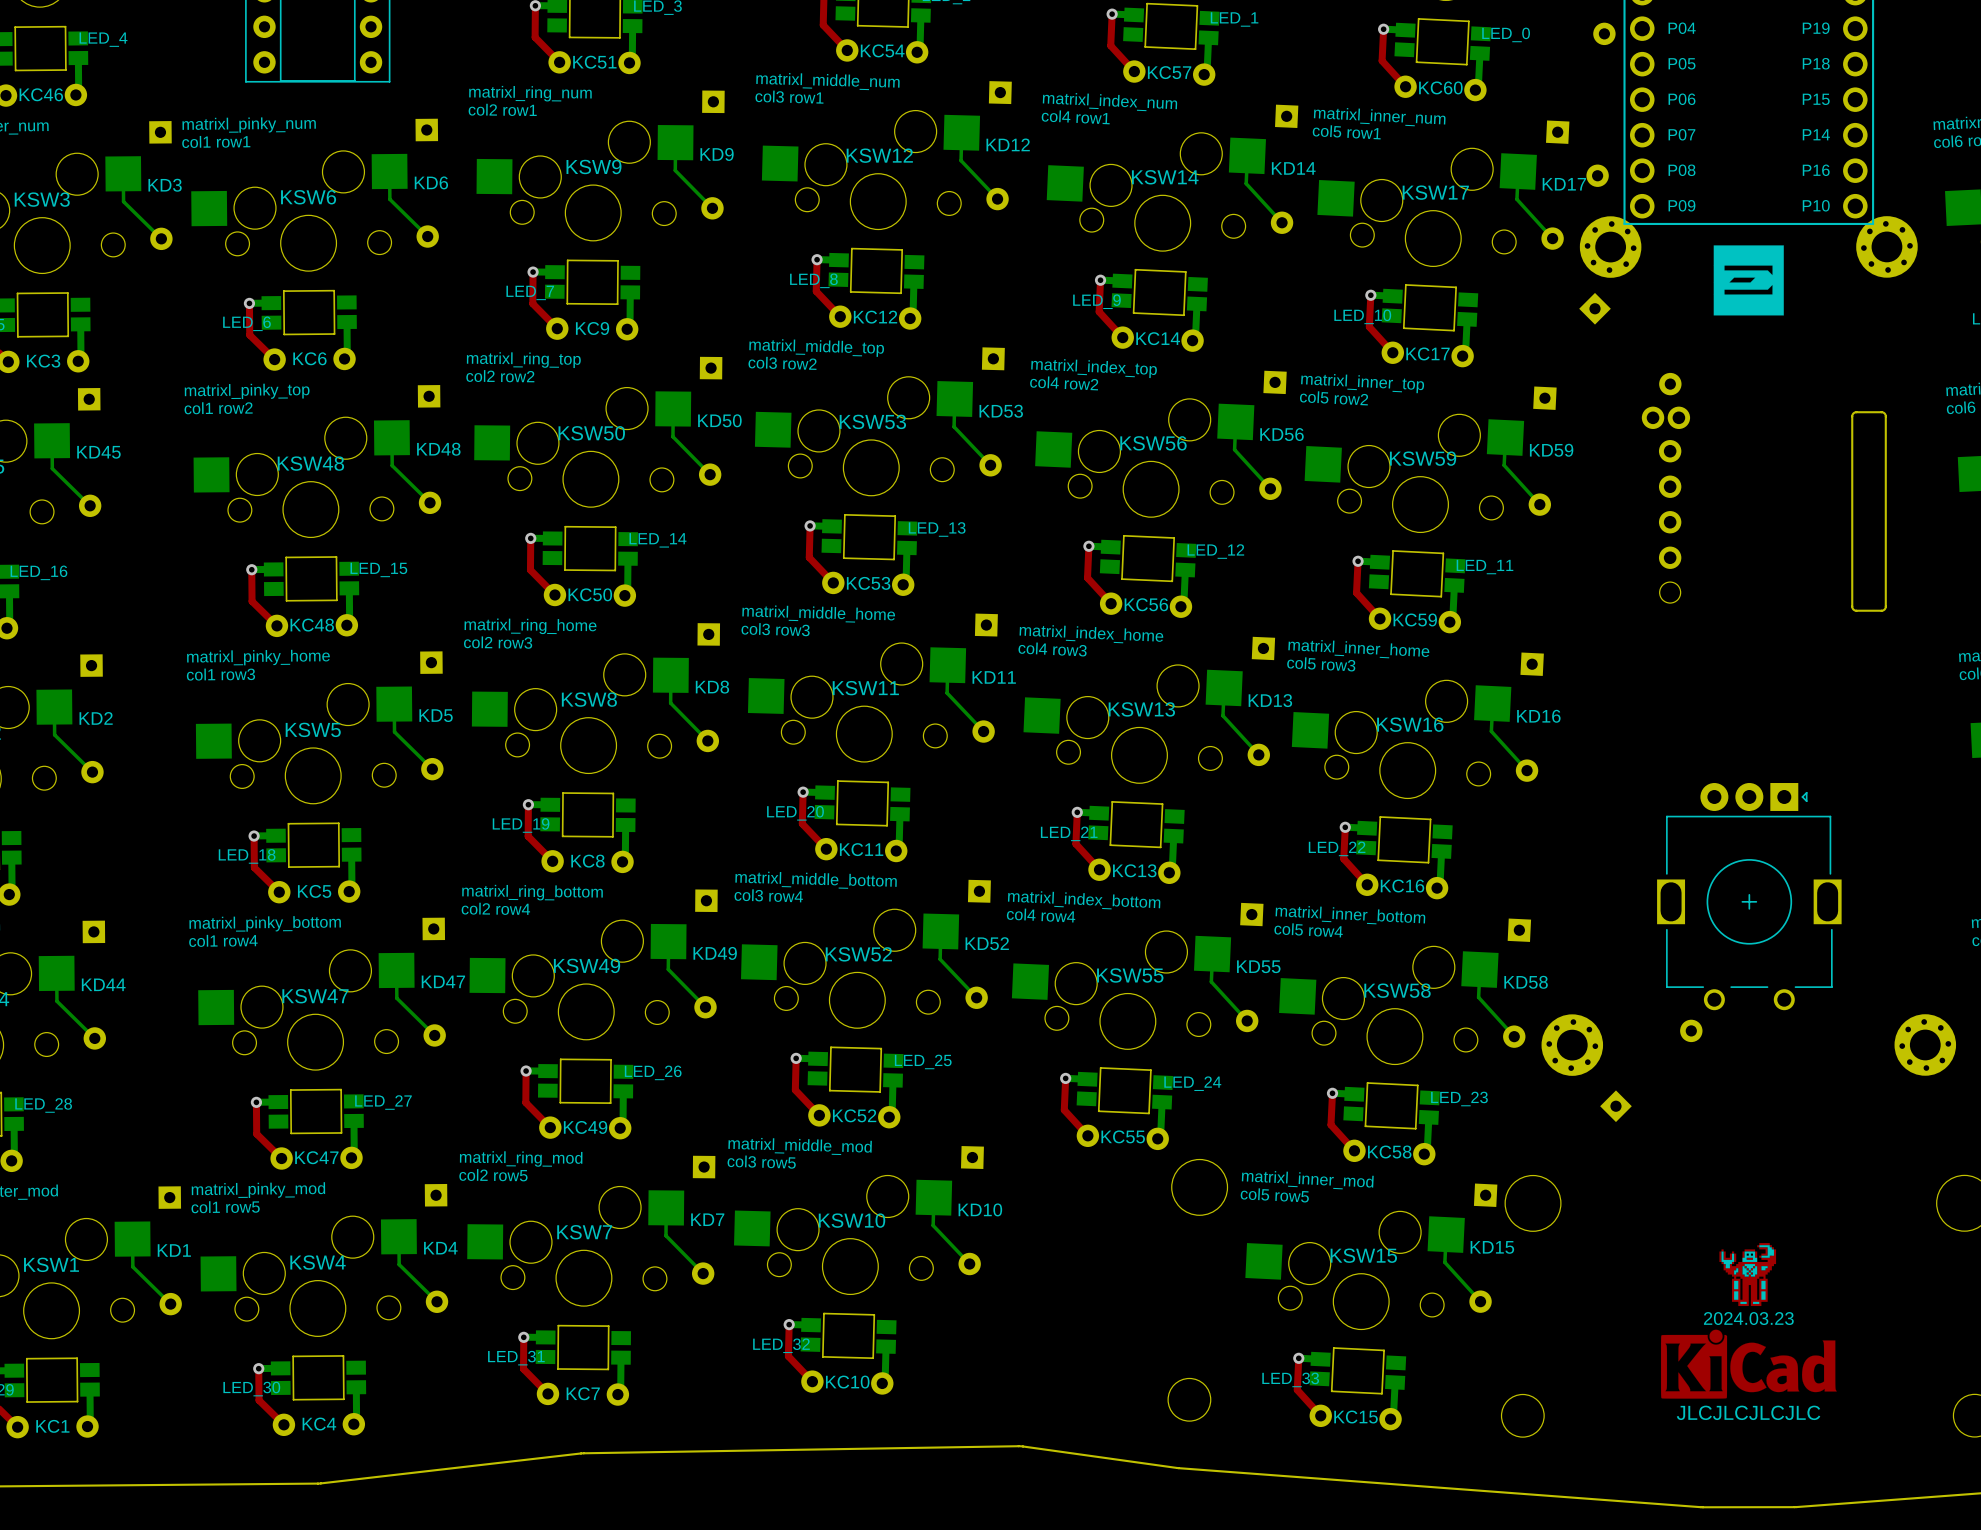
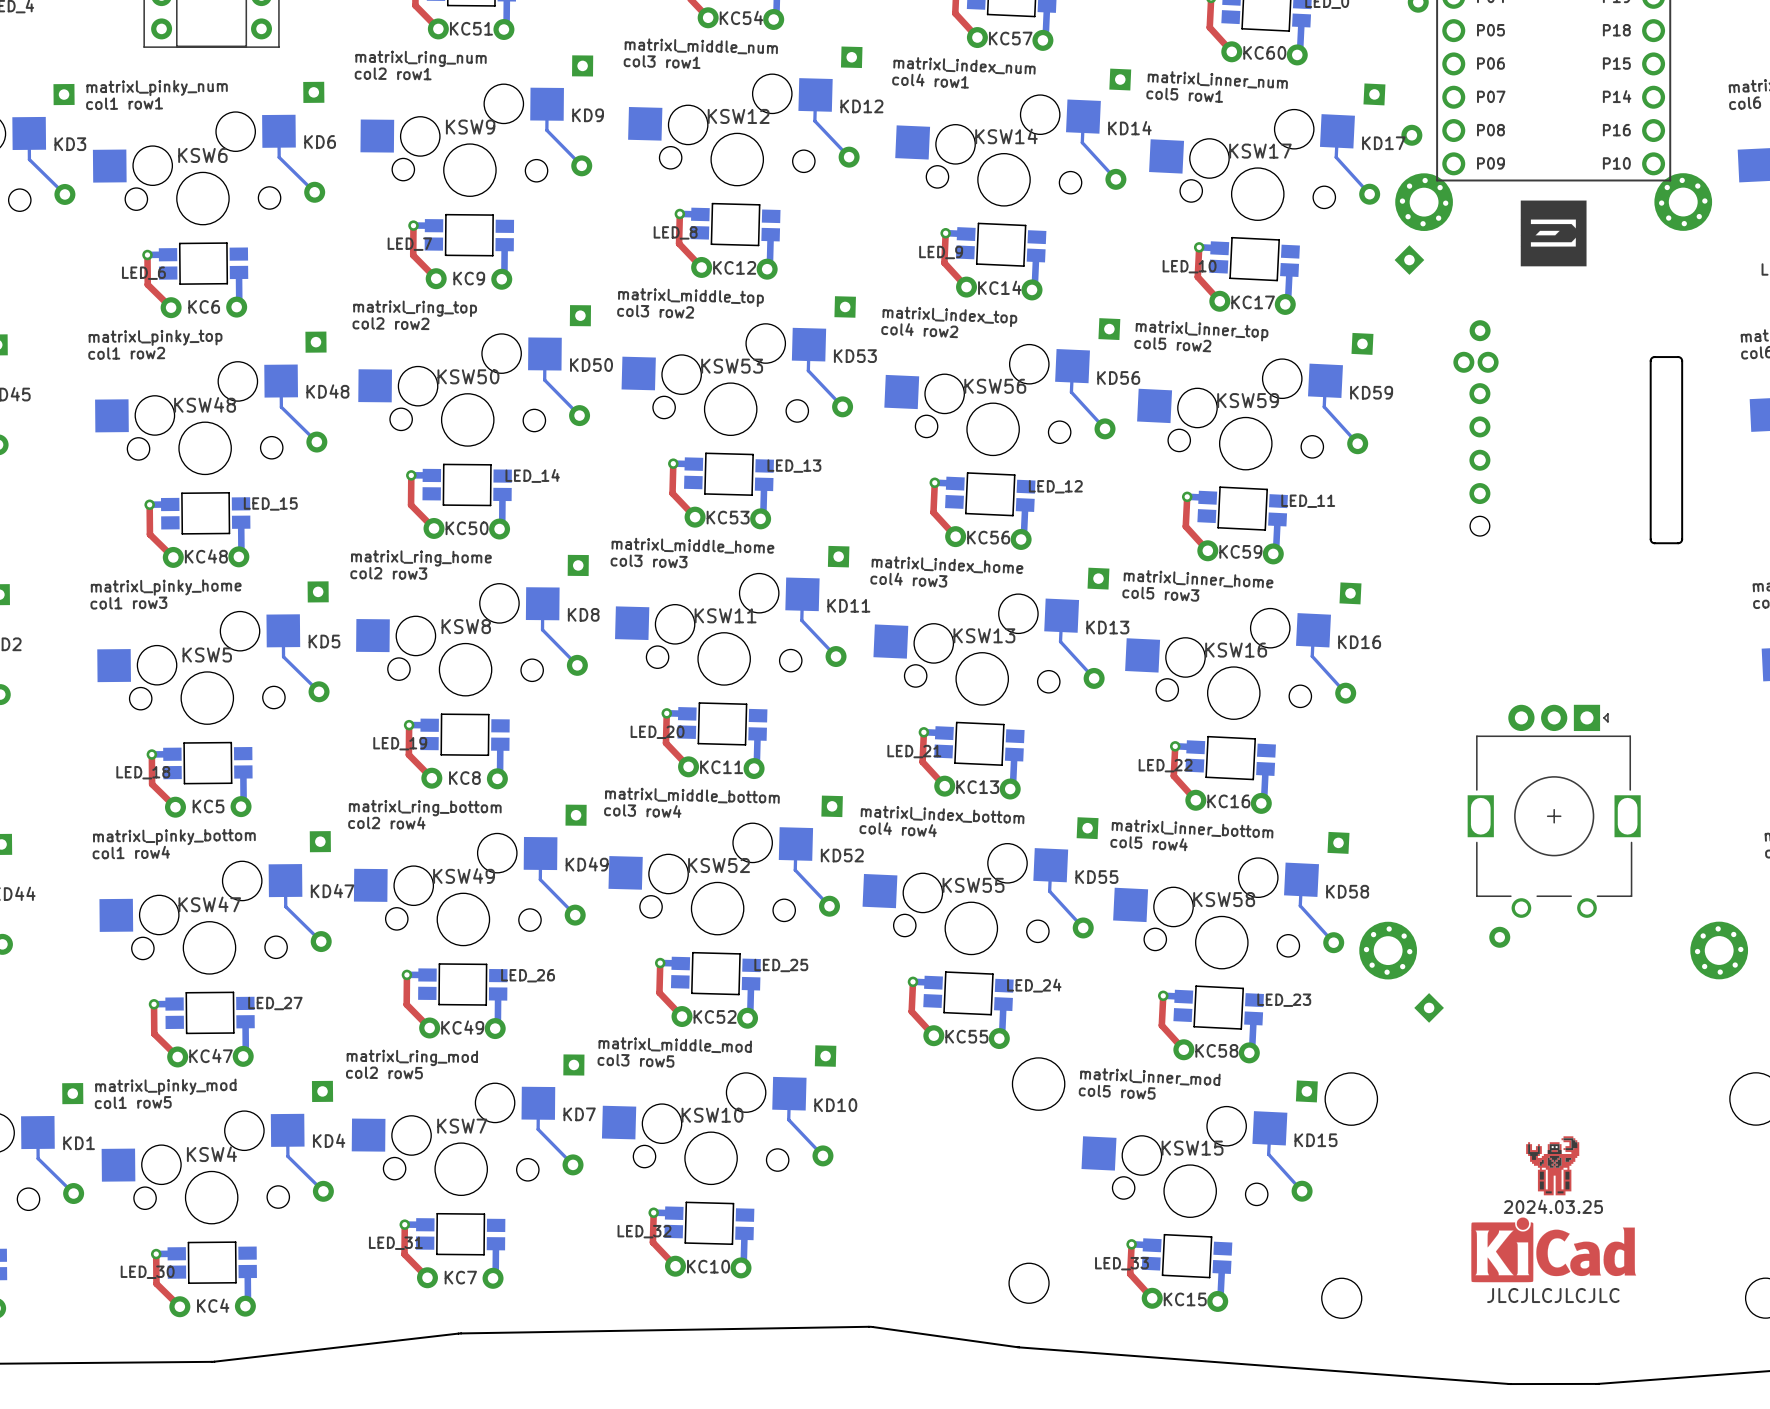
text: 2024.03.23 (1748, 1318) -> 2024.03.25 (1553, 1206)

